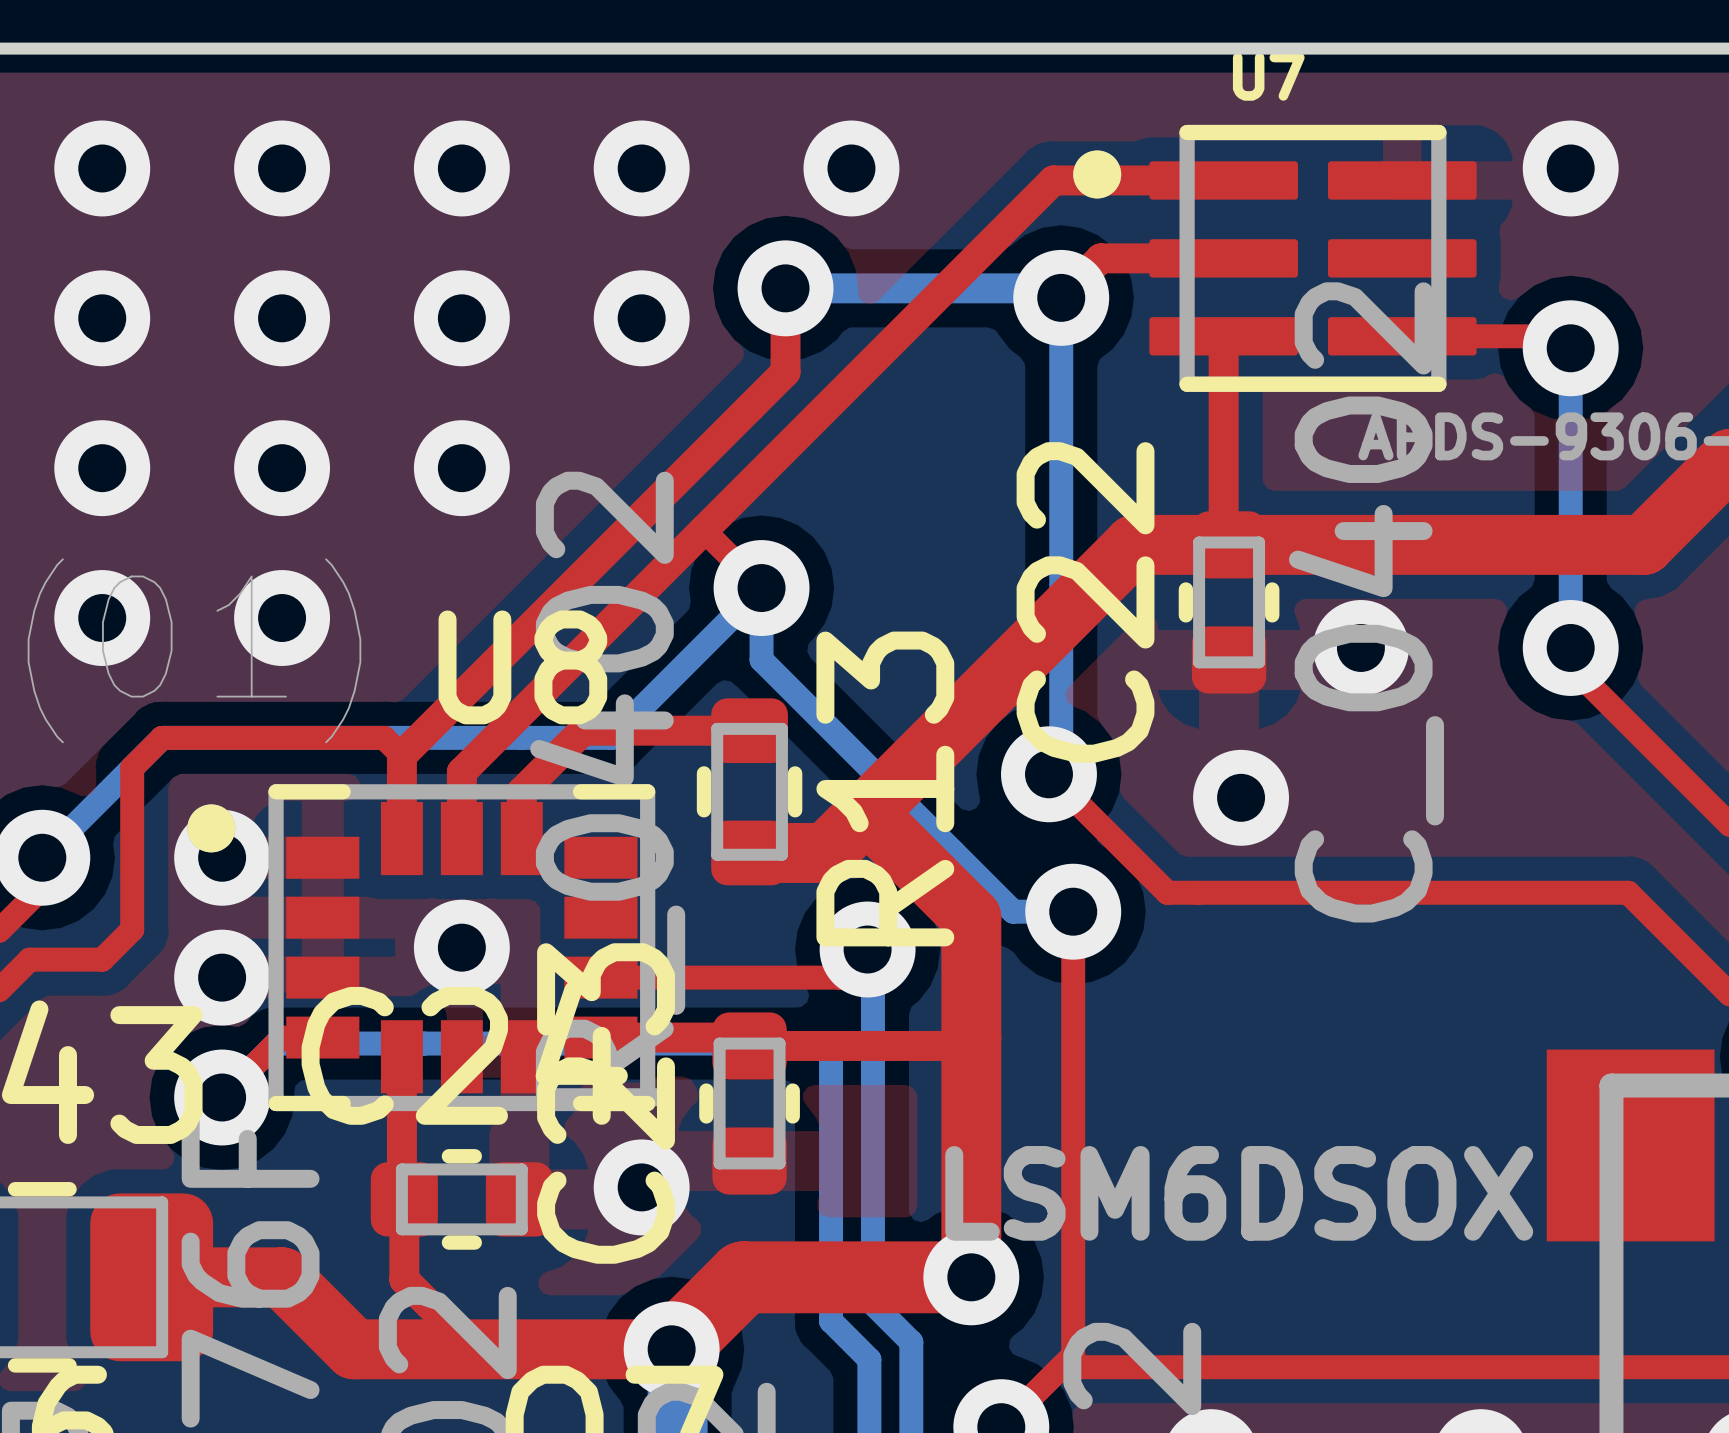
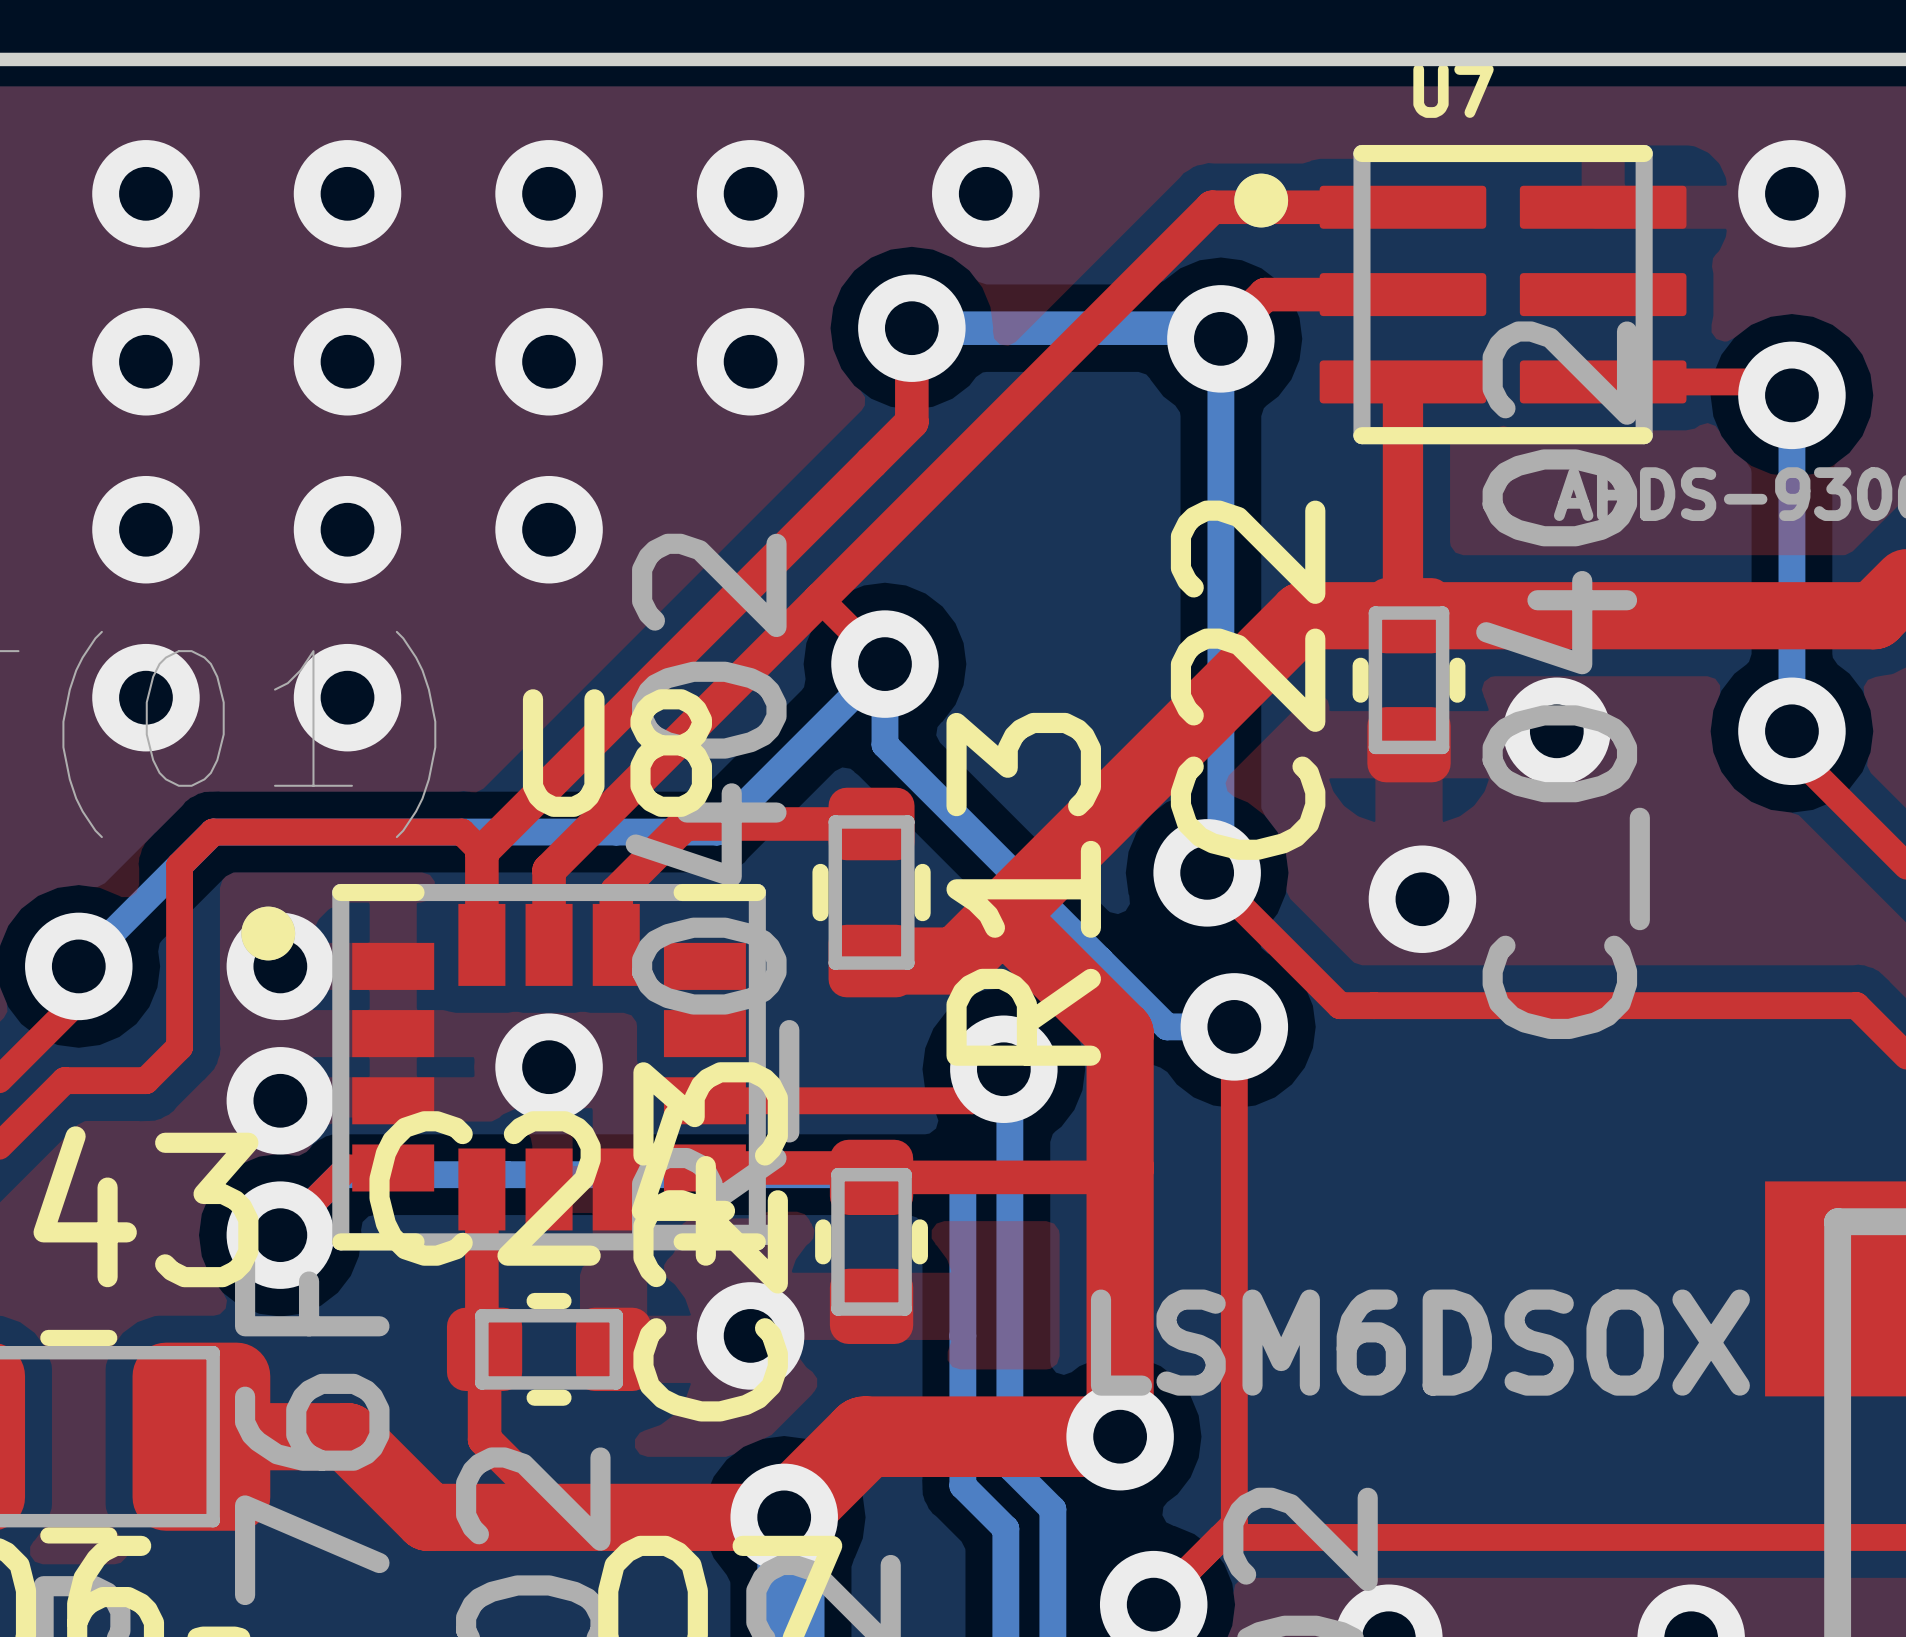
top track width: thin (1223, 336) (1223, 539) (1229, 544) -> thick (1402, 381) (1402, 609) (1409, 615)

